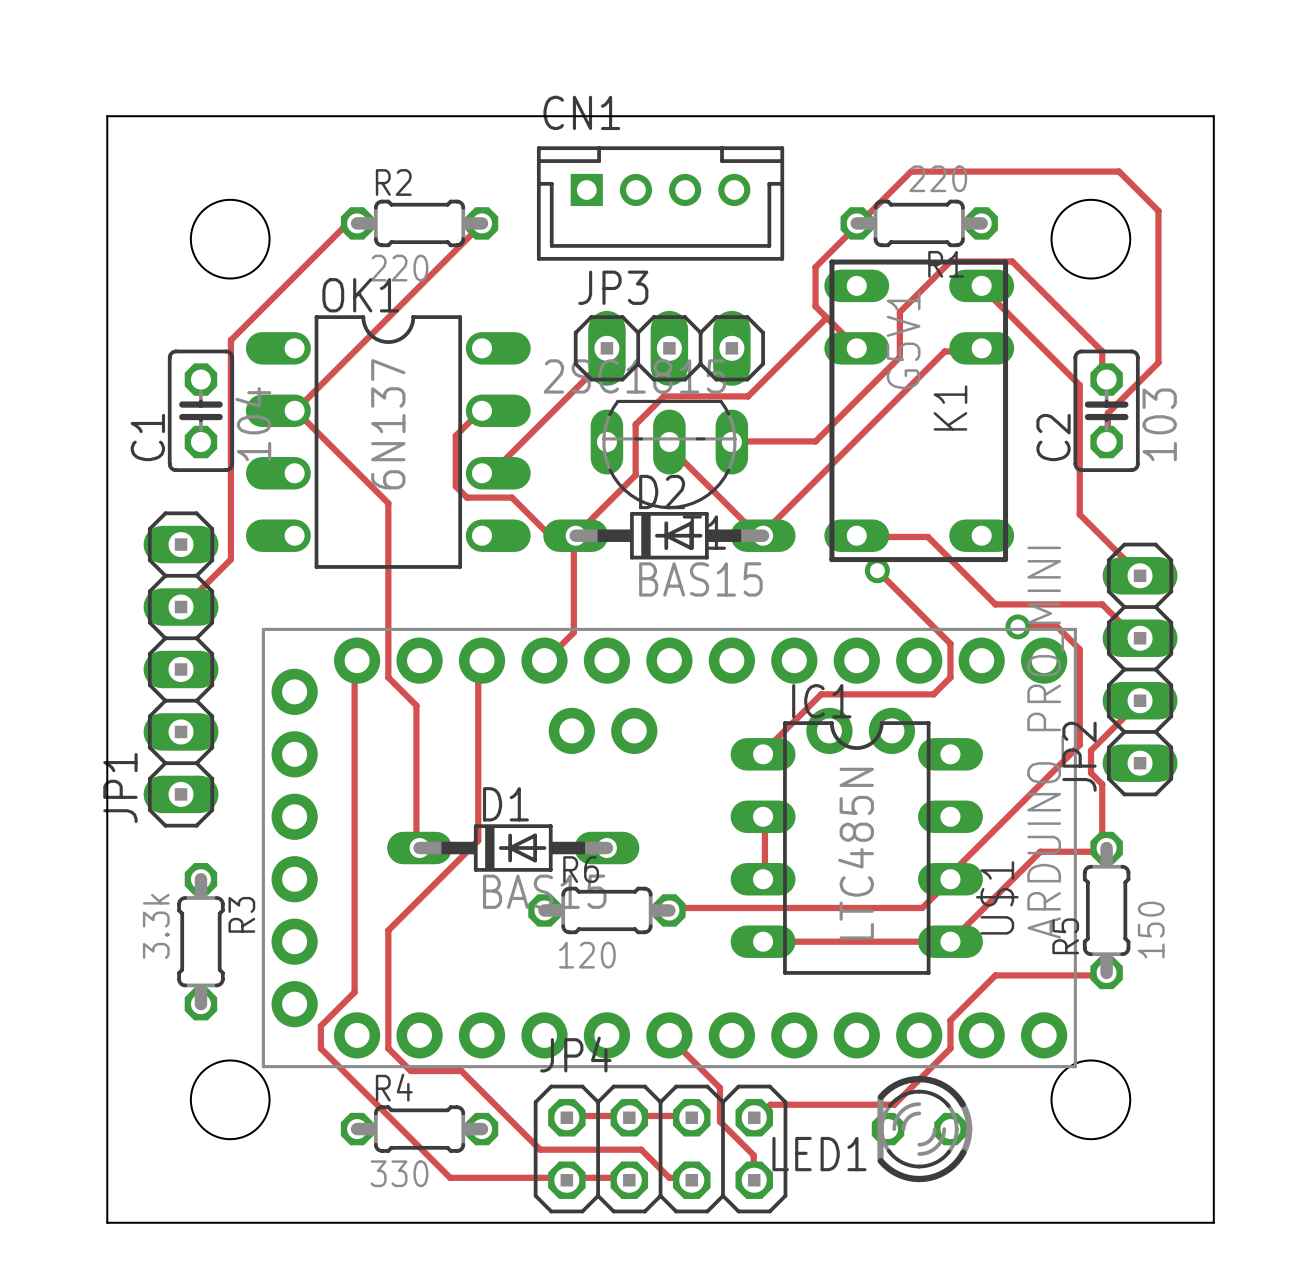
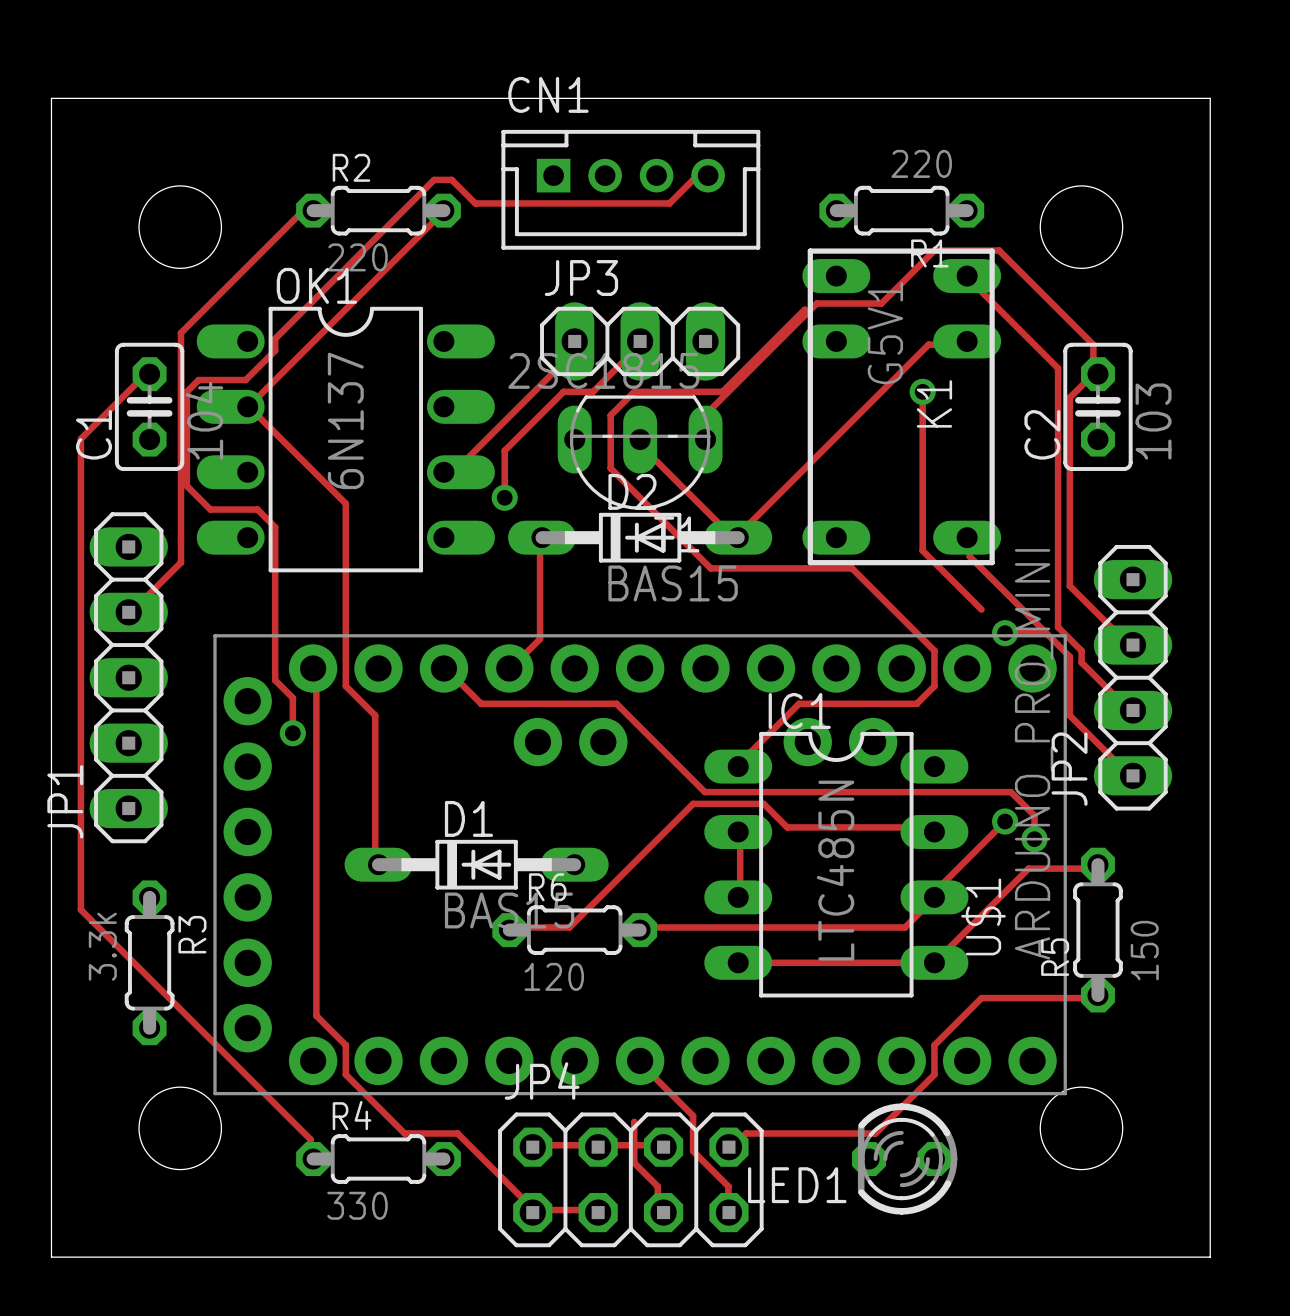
track: none -> (708, 175) (704, 179) (693, 179) (669, 203) (475, 203) (451, 179) (434, 179) (275, 338) (275, 350) (245, 380) (198, 380) (186, 391) (186, 486) (210, 509) (257, 509) (275, 527) (275, 680) (292, 697) (292, 733)
track: (899, 312) (899, 357) (815, 441) (736, 441) -> (881, 303) (816, 303) (710, 409) (710, 438)
track: none -> (640, 341) (640, 344) (593, 391) (563, 391) (504, 450) (504, 497)
track: (856, 348) (815, 306) (815, 267) (854, 227) (856, 223) (860, 222) (911, 171) (1119, 171) (1158, 210) (1158, 362) (1107, 413) (1106, 442) -> none
track: (1068, 373) (1079, 385) (1079, 402) -> (1093, 374) (1069, 397)
track: none -> (149, 374) (145, 374) (80, 438) (80, 909) (310, 1139) (310, 1157) (313, 1159)
via: none -> (922, 391)
track: (482, 410) (455, 435) (455, 486) (467, 497) (512, 497) (545, 531) (573, 531) (575, 535) (635, 475) (635, 424) (641, 418) -> (857, 574) (852, 568) (710, 568) (610, 468) (610, 415)
via: none -> (504, 497)
track: (1079, 514) (1140, 575) -> (1069, 515) (1069, 586) (1093, 609)
track: (856, 535) (927, 536) (939, 548) -> (922, 391) (922, 550)
track: none -> (967, 537) (969, 538) (969, 556) (1046, 633)
via: (877, 570) -> none
track: (995, 604) (1102, 604) -> none
track: (357, 660) (354, 660) (354, 992) (320, 1026) (320, 1048) (450, 1177) (562, 1177) (566, 1180) -> none
track: (482, 660) (478, 660) (478, 840) (388, 930) (388, 1020) -> (313, 668) (316, 668) (316, 1015) (345, 1045)
track: none -> (443, 668) (481, 703) (616, 703) (704, 792) (1010, 792) (1034, 815) (1034, 839)
track: (1140, 700) (1090, 750) (1090, 773) (1102, 784) (1102, 846) (1106, 848) -> (1132, 710) (1128, 709) (1081, 662) (1081, 650) (1058, 627) (1058, 368)
track: (1079, 705) (1079, 744) (1017, 806) -> (1069, 715) (1128, 774) (1132, 775)
via: none -> (292, 733)
via: none -> (1005, 821)
track: none -> (934, 831) (934, 827) (787, 827) (763, 803) (693, 803) (569, 927) (510, 927) (509, 930)
via: none -> (1034, 839)
track: (410, 1070) (461, 1070) (495, 1104) -> (369, 1098) (404, 1133) (457, 1133)
track: none -> (634, 1121) (634, 1162) (657, 1186) (657, 1210)
track: (540, 1149) (641, 1149) (669, 1177) (686, 1177) -> (504, 1180) (534, 1210)

